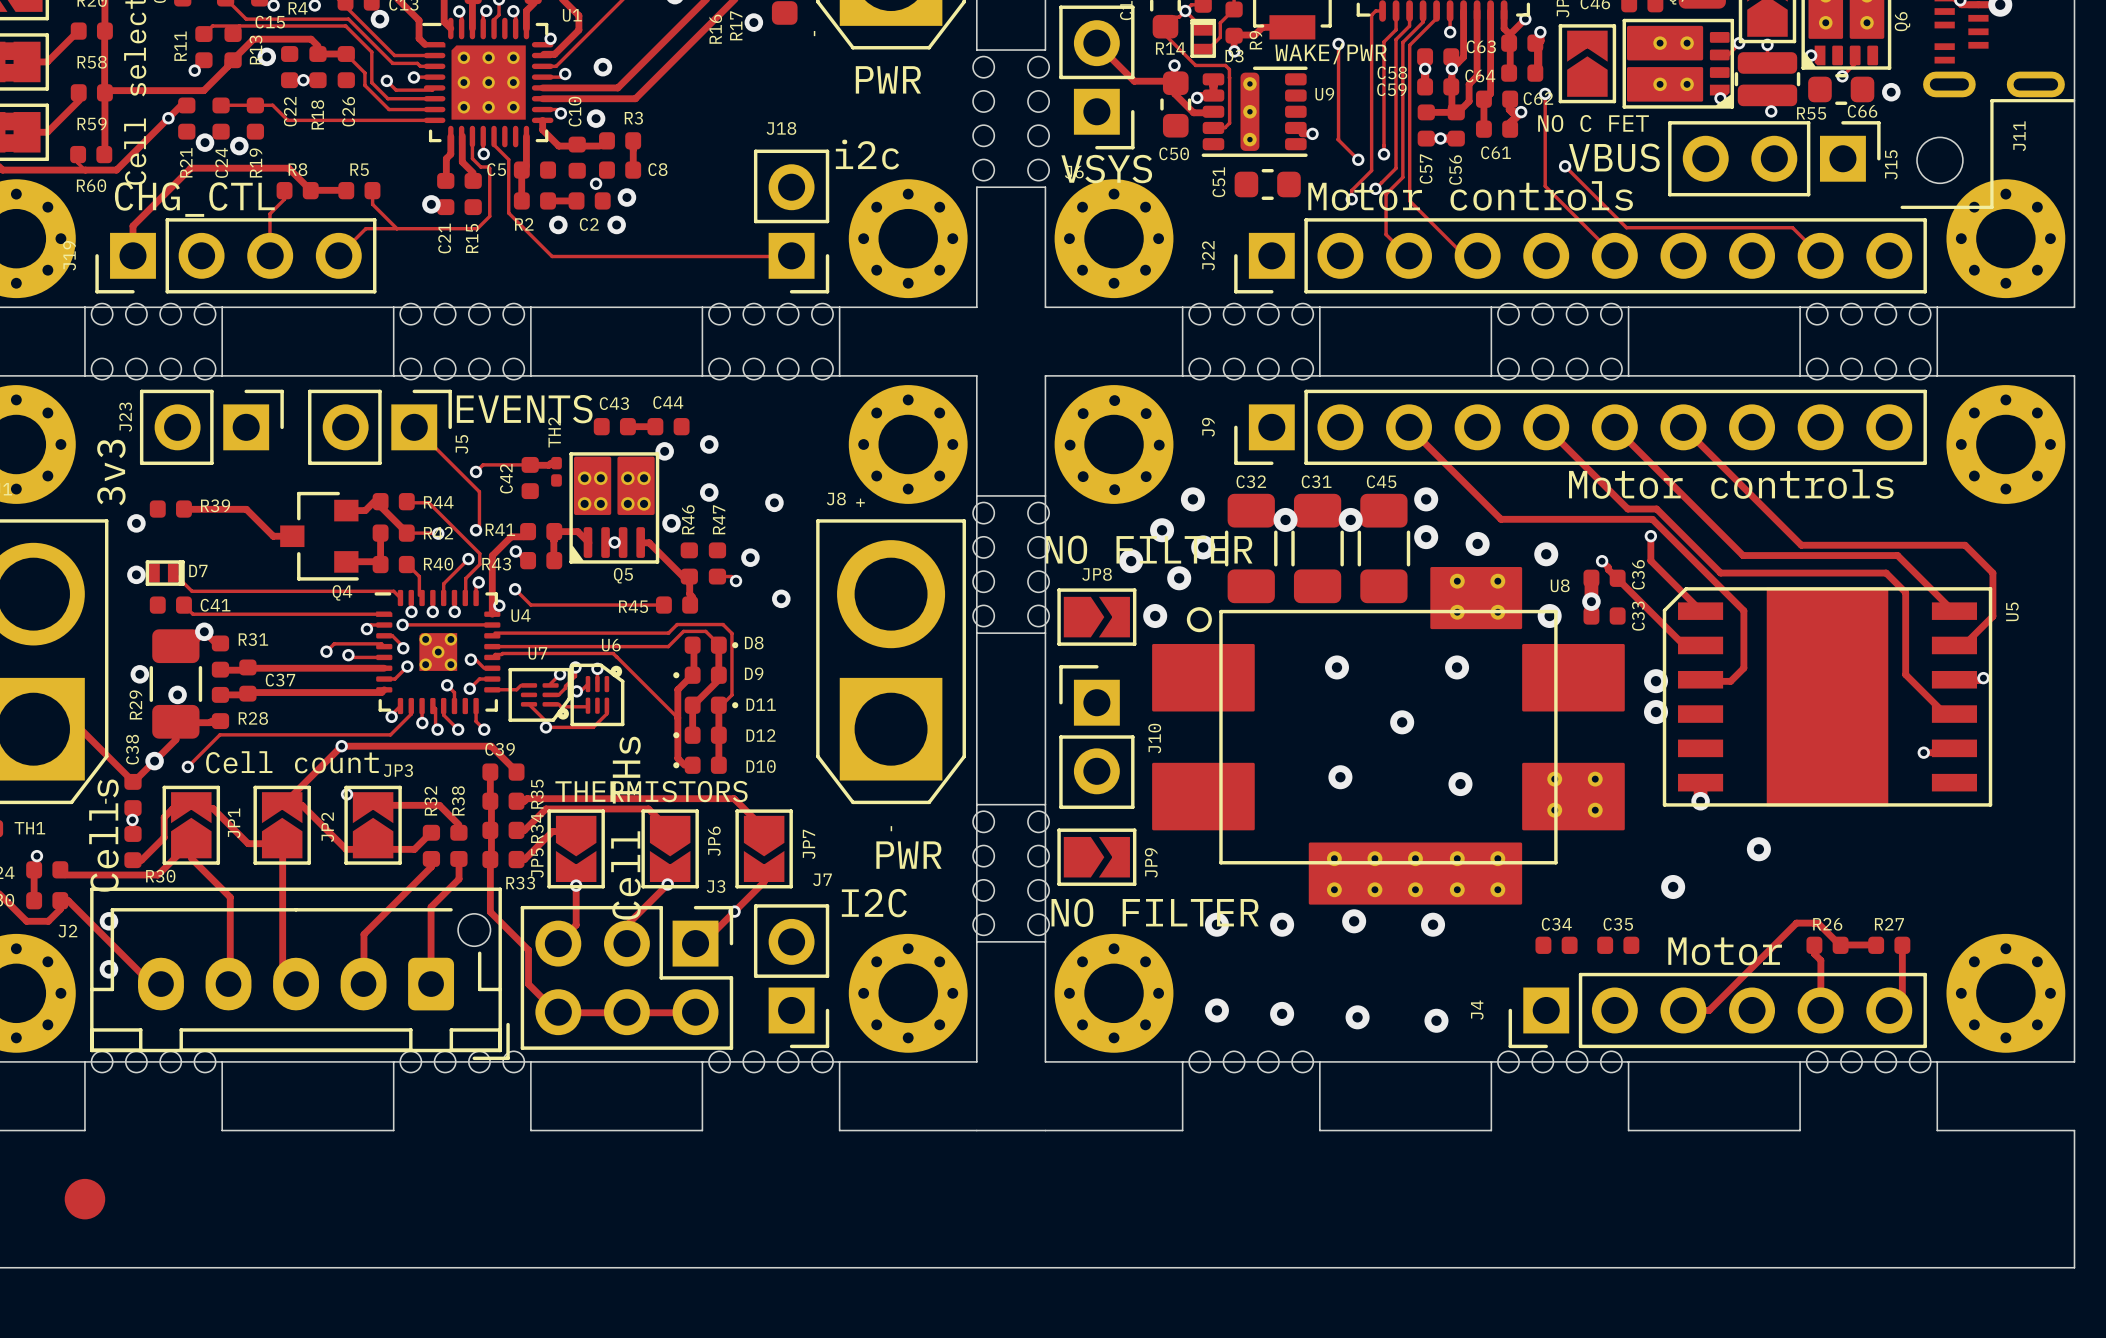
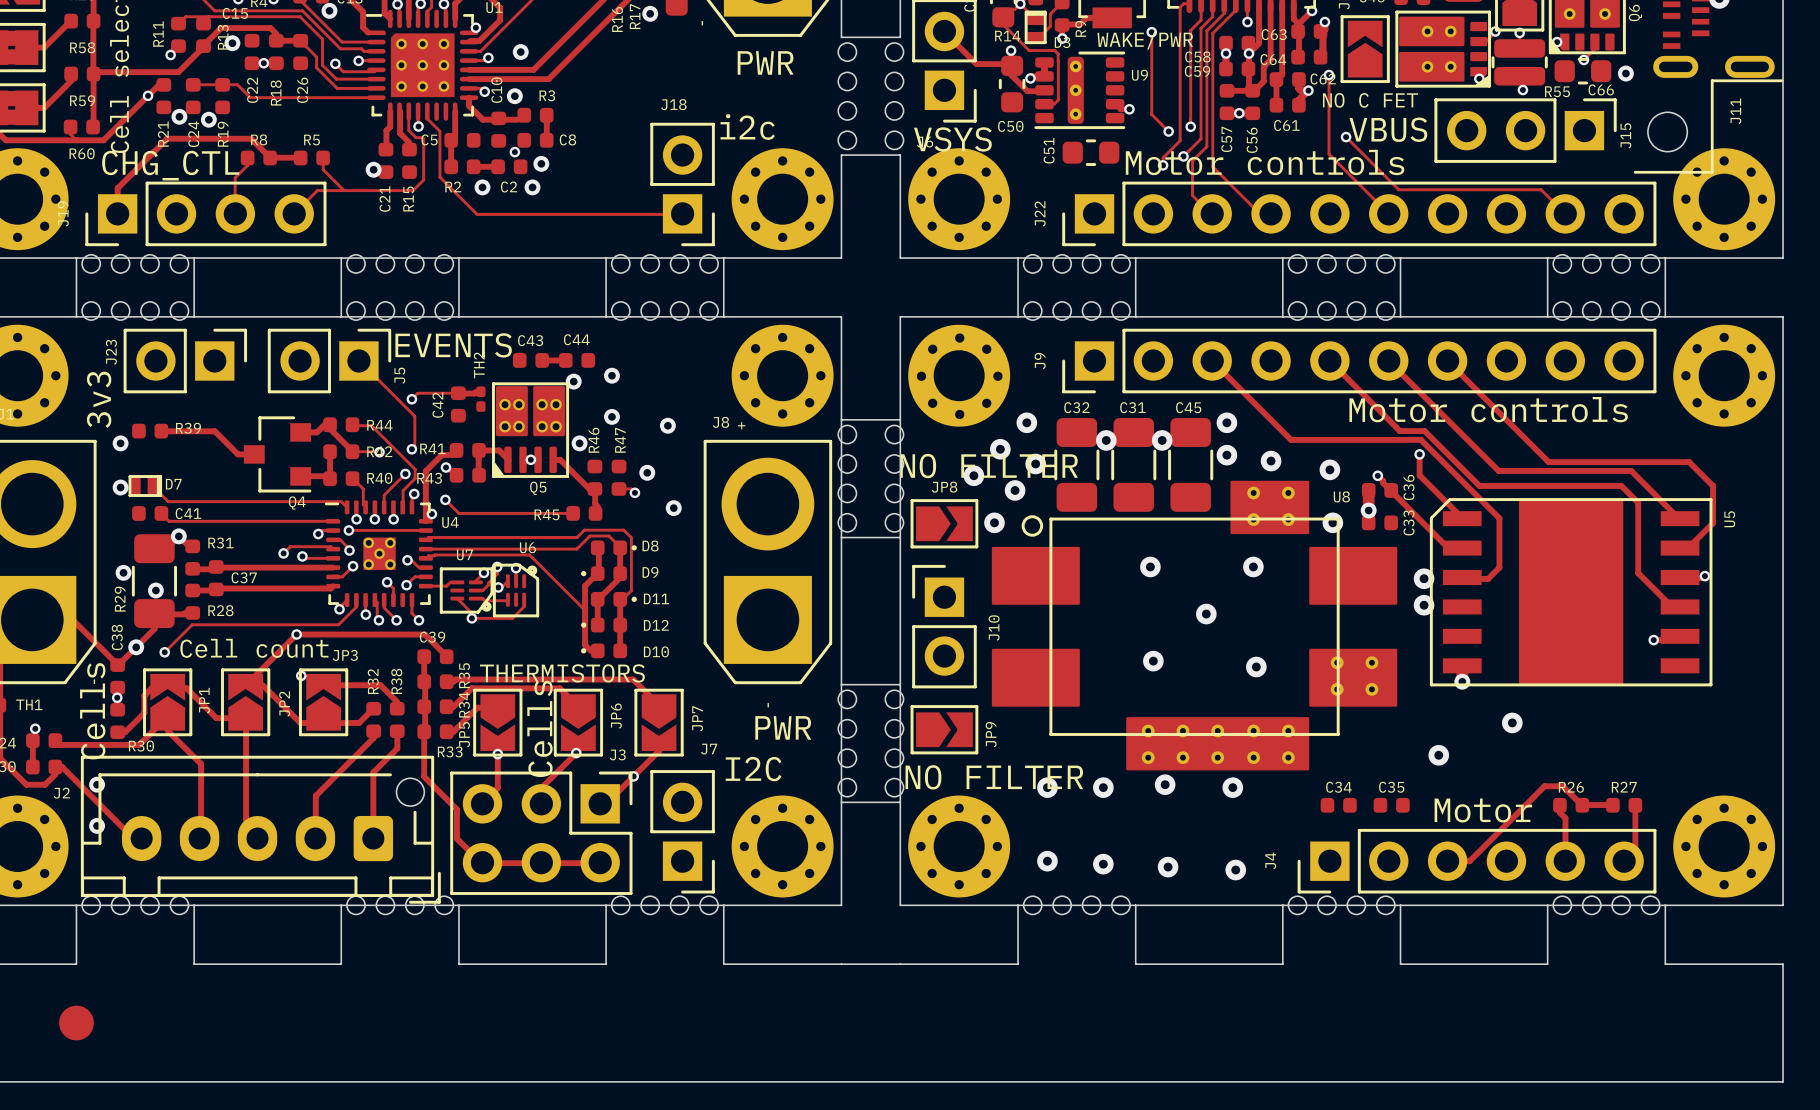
J3 value: Cell THs (625, 828) -> Cells (539, 728)

